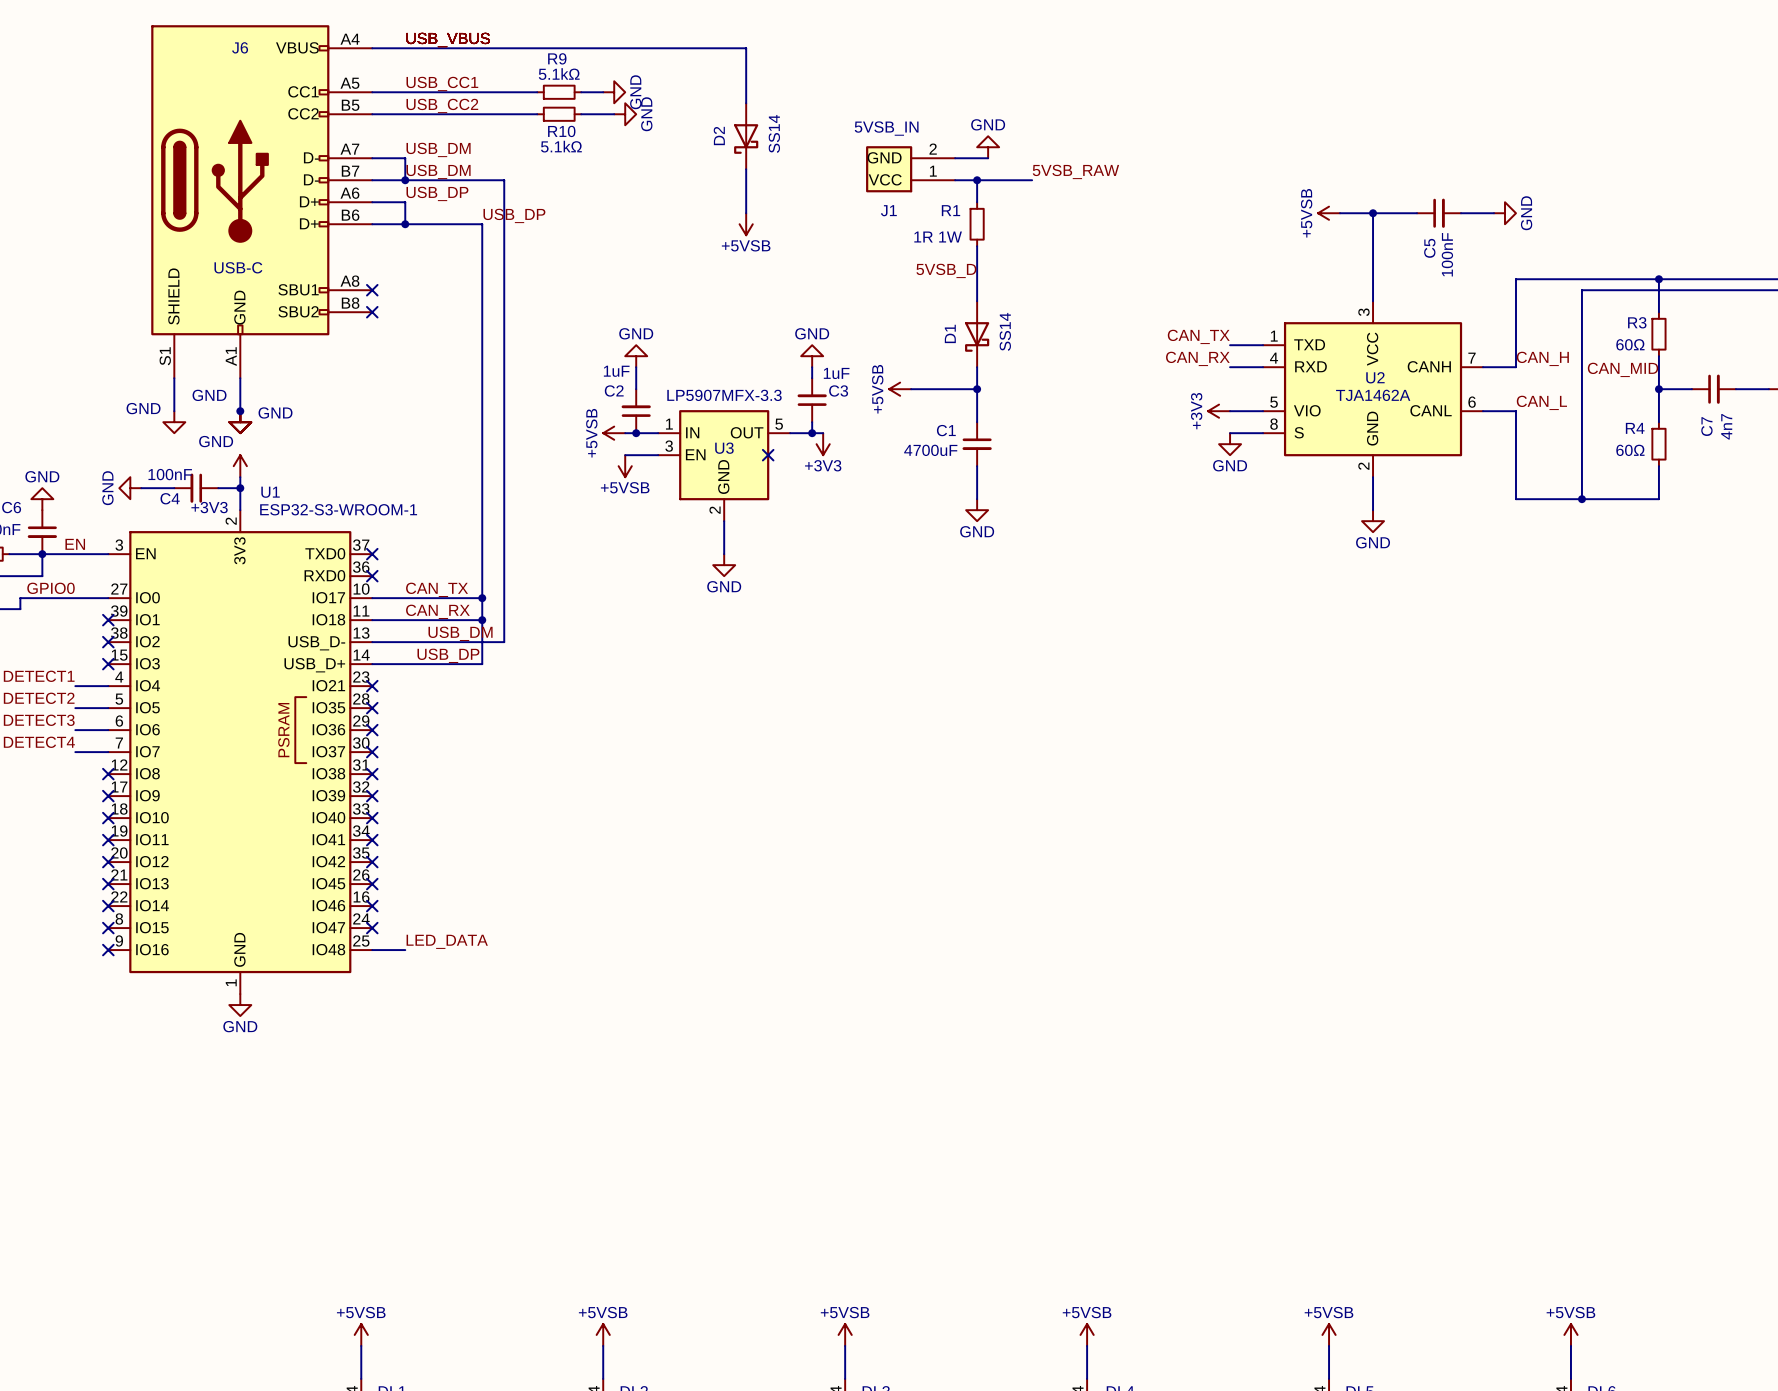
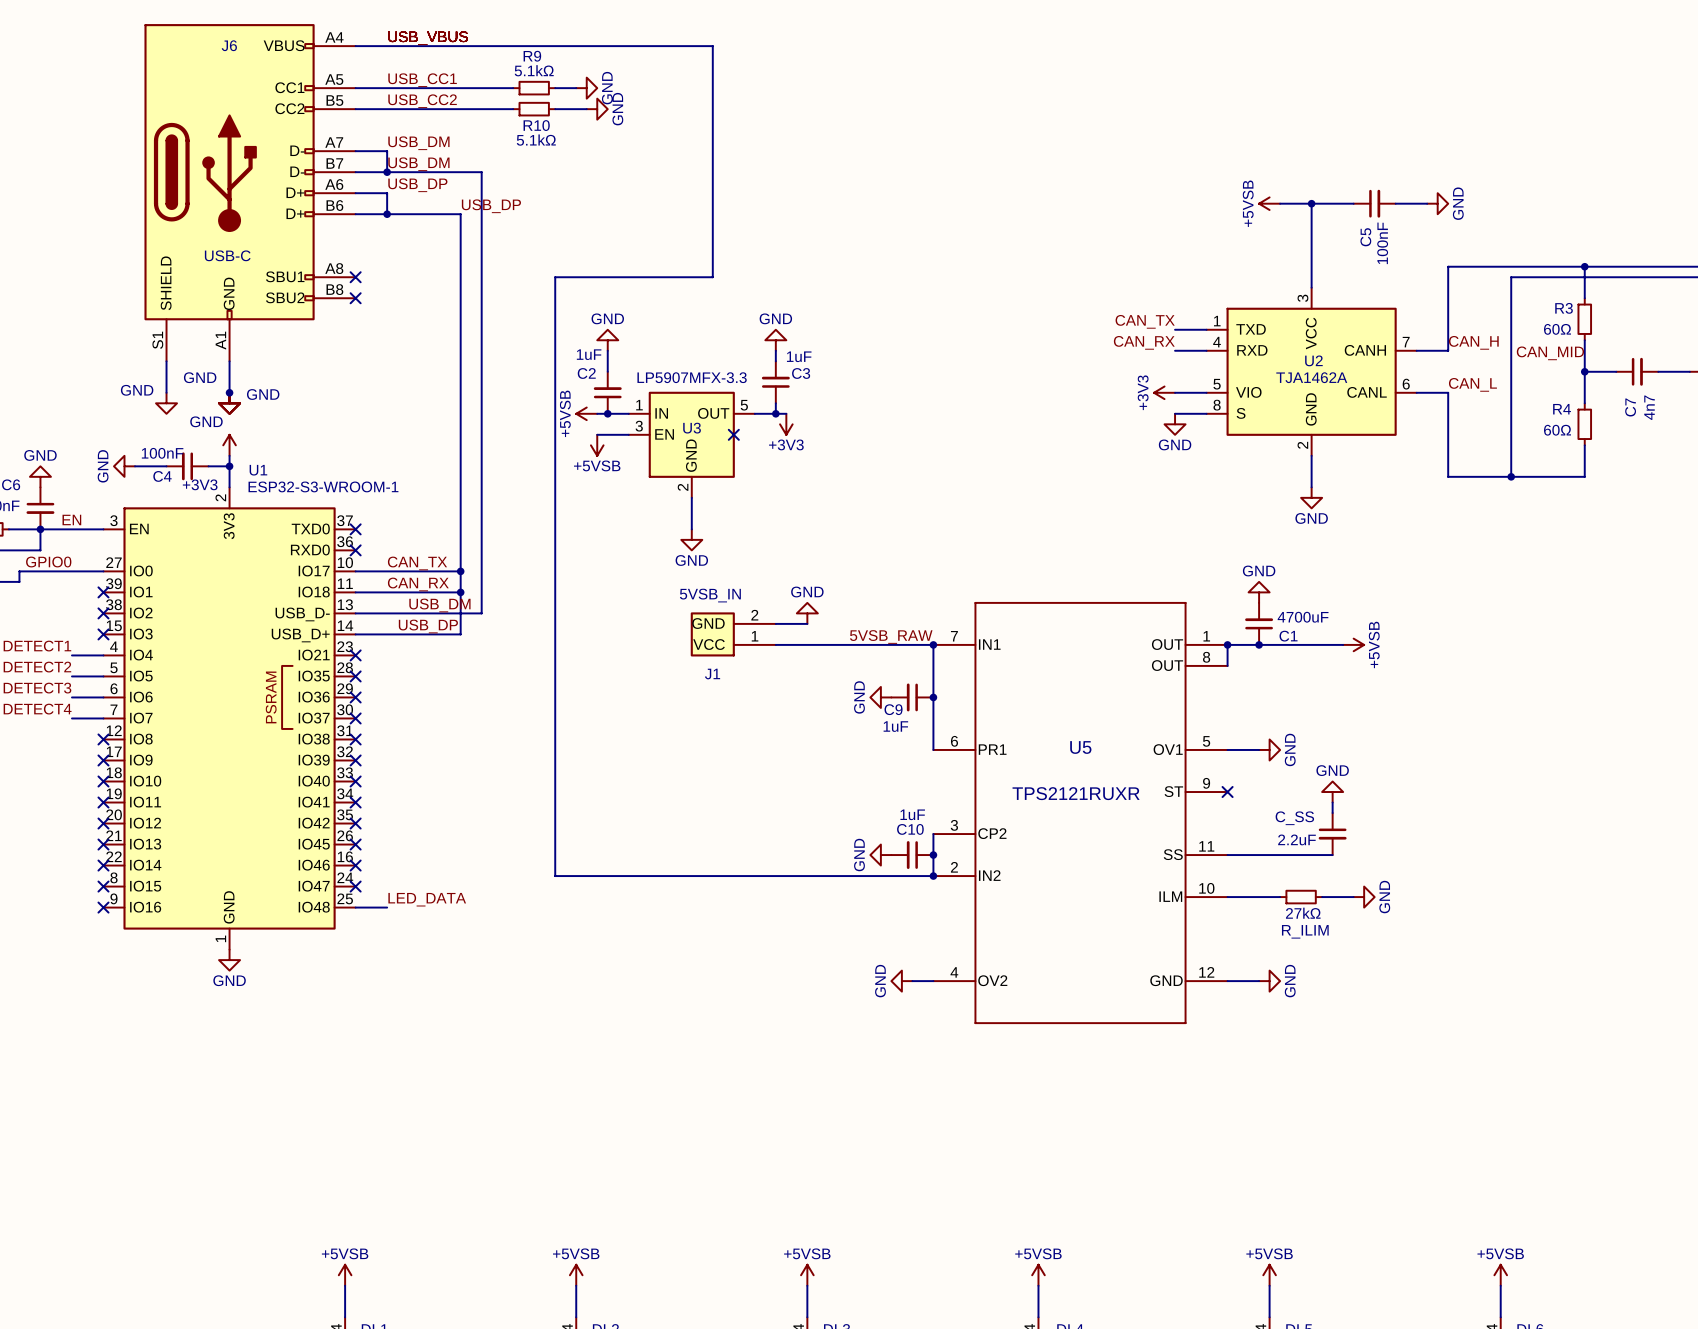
D2: SS14 (746, 136) -> none
power symbol: GND (988, 147) -> none
wire: (955, 158) (988, 158) -> none
J1 position: (910, 169) -> (733, 634)
label: 5VSB_RAW (1075, 171) -> none
wire: (955, 180) (1032, 180) -> none
wire: (977, 180) (977, 202) -> none
junction: (977, 180) -> none
wire: none -> (712, 203) (712, 277) (555, 277) (555, 876) (933, 876) (933, 834)
power symbol: +5VSB (746, 224) -> none
R1: 1R 1W (977, 224) -> none
wire: (977, 246) (977, 301) -> none
label: 5VSB_D (946, 270) -> none
D1: SS14 (977, 334) -> none
wire: (977, 367) (977, 422) -> none
power symbol: +5VSB (900, 389) -> none
wire: (911, 389) (977, 389) -> none
junction: (977, 389) -> none
C1 rotation: 0° (977, 444) -> 180° (1259, 623)
C1 position: (977, 444) -> (1259, 623)
wire: (977, 466) (977, 499) -> none
power symbol: GND (977, 510) -> none
power symbol: none -> GND (1259, 592)
power symbol: none -> GND (807, 613)
wire: none -> (775, 623) (807, 623)
label: none -> 5VSB_RAW (891, 636)
wire: none -> (775, 644) (933, 644) (933, 749)
junction: none -> (933, 644)
junction: none -> (1227, 644)
junction: none -> (1259, 644)
wire: none -> (1343, 644) (1227, 644) (1227, 665)
power symbol: none -> +5VSB (1353, 644)
power symbol: none -> GND (880, 697)
C9: none -> 1uF (912, 697)
junction: none -> (933, 697)
wire: none -> (1227, 749) (1259, 749)
power symbol: none -> GND (1269, 749)
no-connect mark: none -> (1227, 792)
power symbol: none -> GND (1332, 792)
wire: none -> (1332, 802) (1332, 813)
U5: none -> TPS2121RUXR (1080, 813)
C_SS: none -> 2.2uF (1332, 834)
power symbol: none -> GND (880, 855)
C10: none -> 1uF (912, 855)
junction: none -> (933, 855)
wire: none -> (1227, 855) (1332, 855)
junction: none -> (933, 876)
wire: none -> (1227, 897) (1280, 897)
R_ILIM: none -> 27kΩ (1301, 897)
wire: none -> (1322, 897) (1353, 897)
power symbol: none -> GND (1364, 897)
power symbol: none -> GND (901, 981)
wire: none -> (912, 981) (933, 981)
wire: none -> (1227, 981) (1259, 981)
power symbol: none -> GND (1269, 981)

